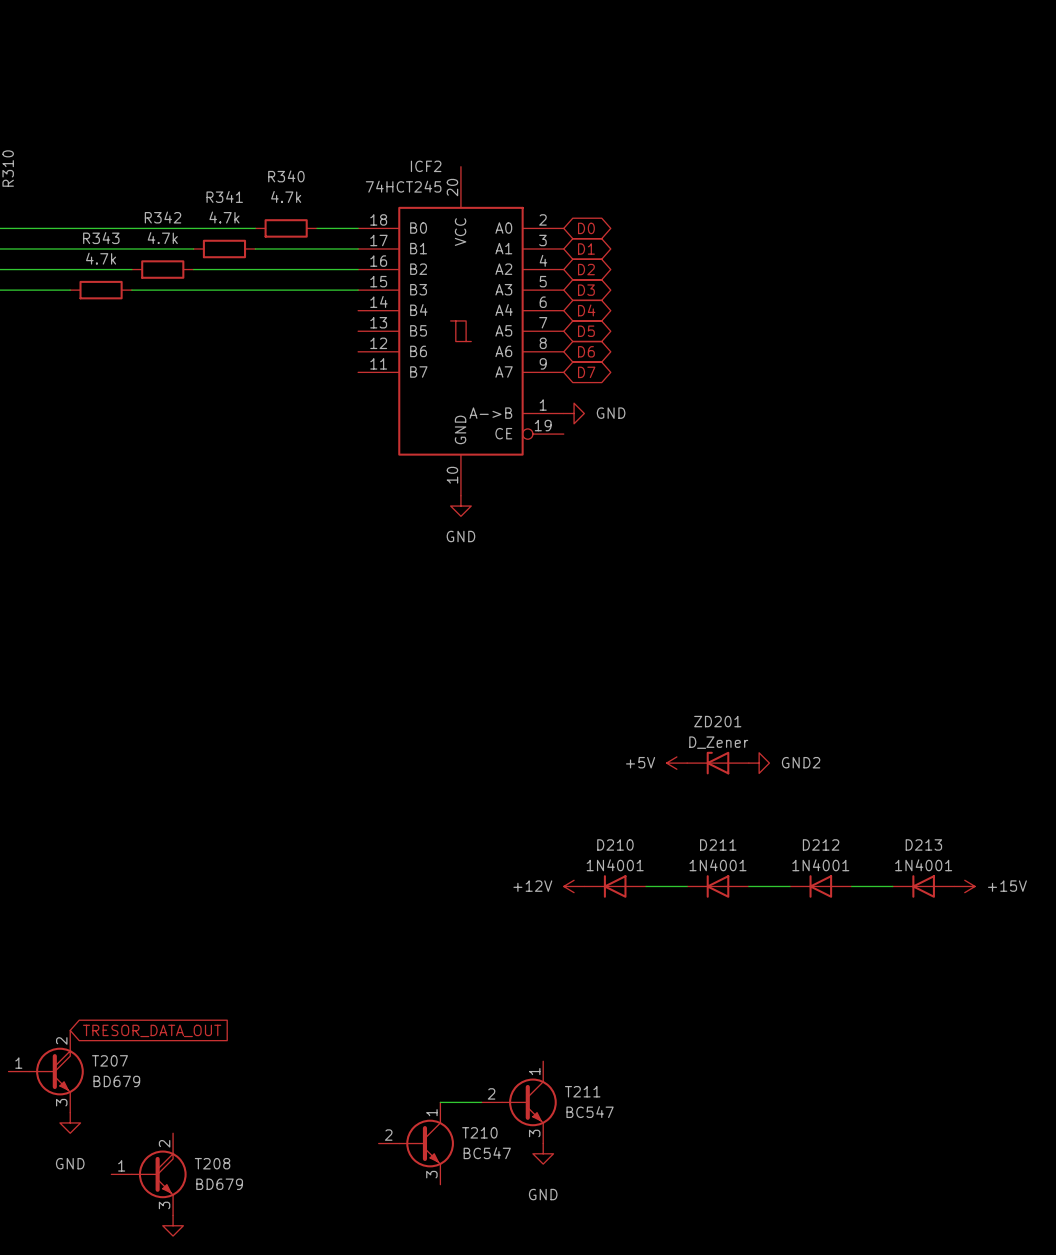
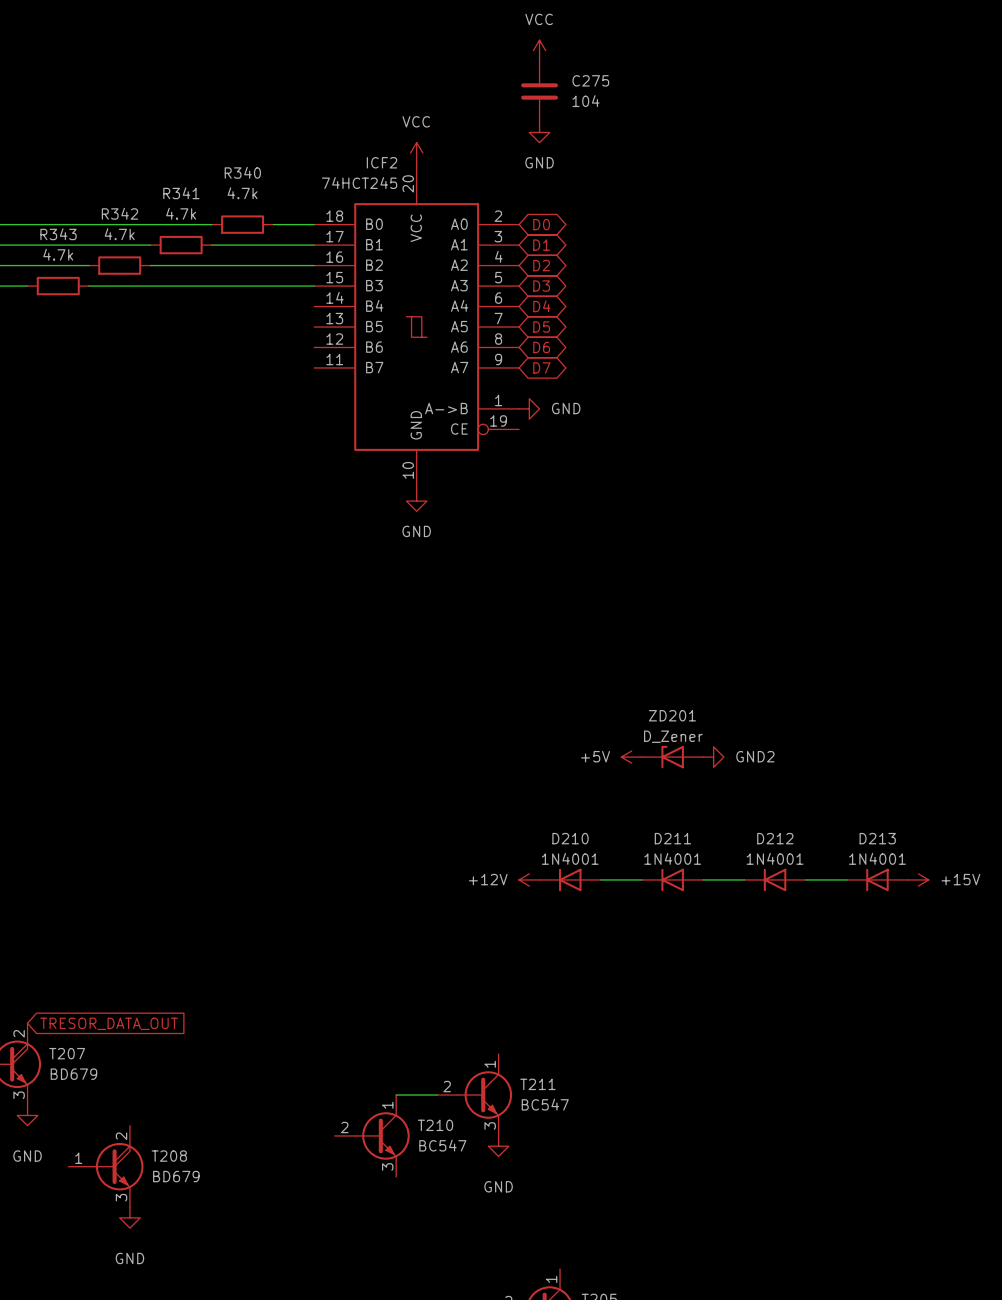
power symbol: none -> VCC (539, 50)
C275: none -> 104 (539, 91)
power symbol: none -> GND (539, 132)
power symbol: none -> VCC (416, 152)

